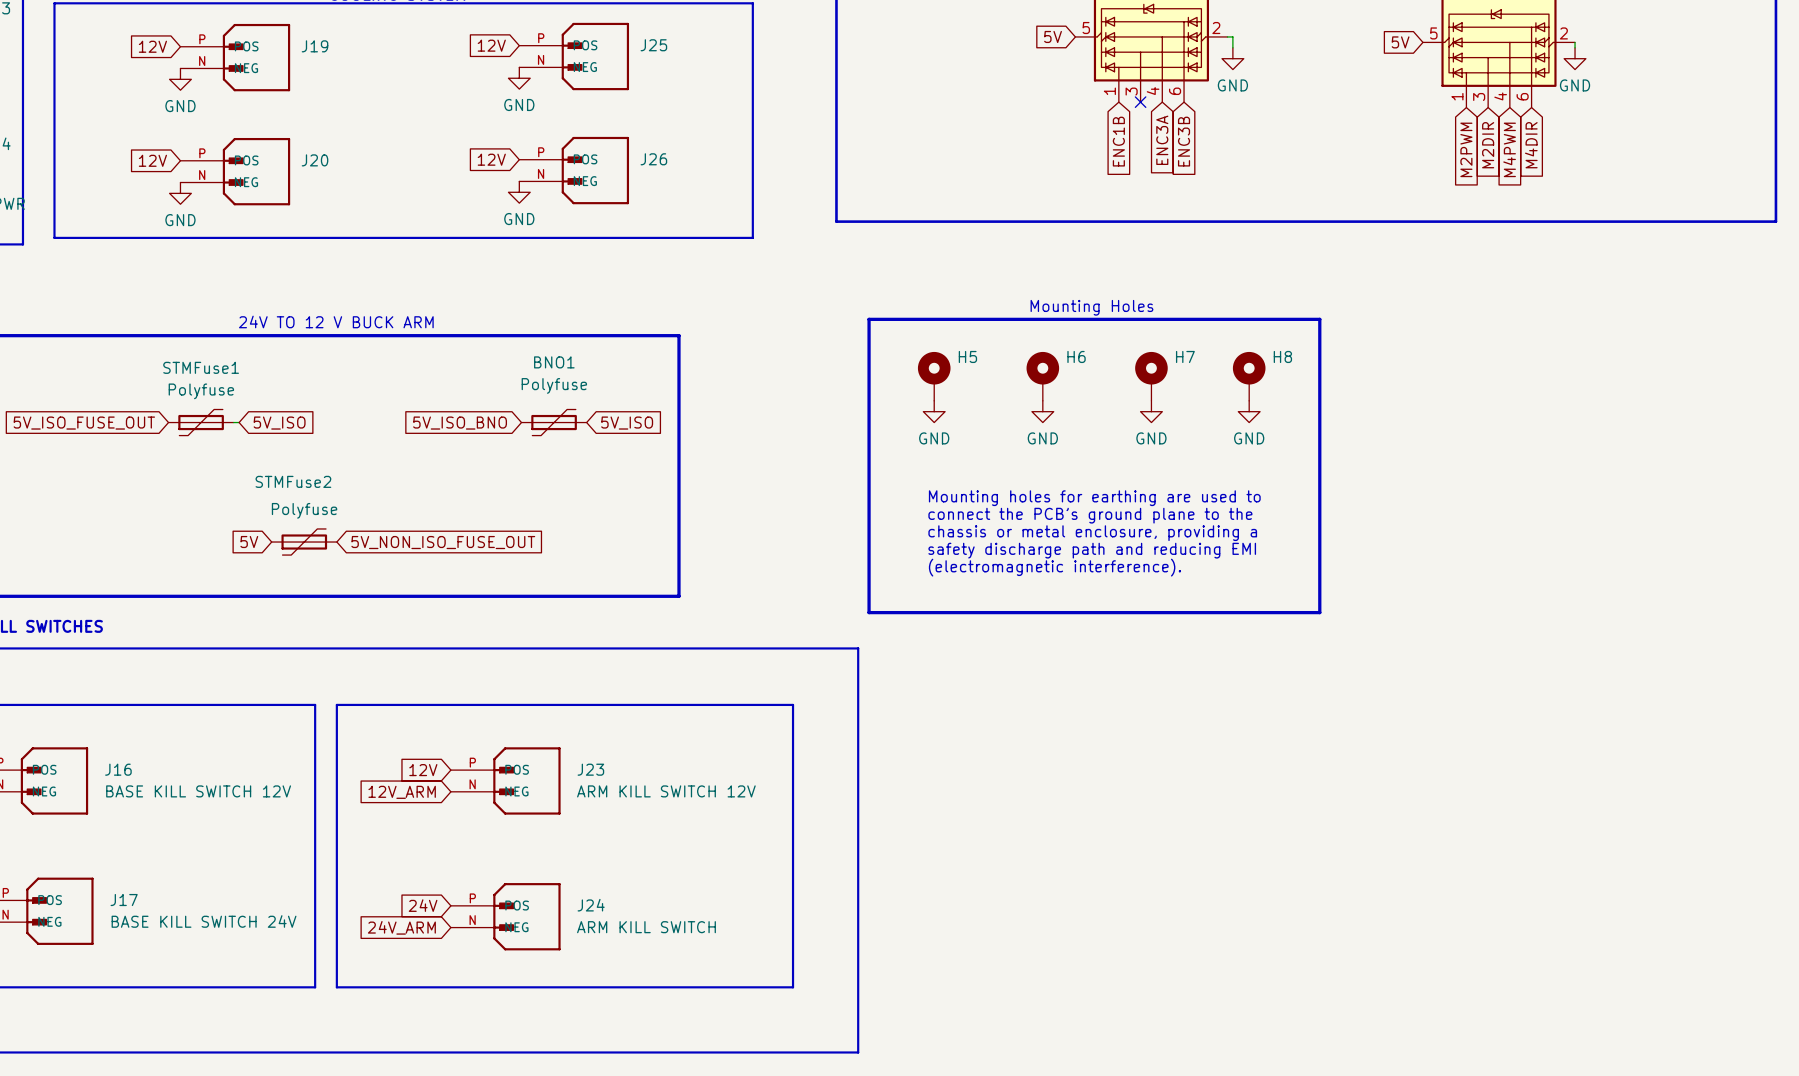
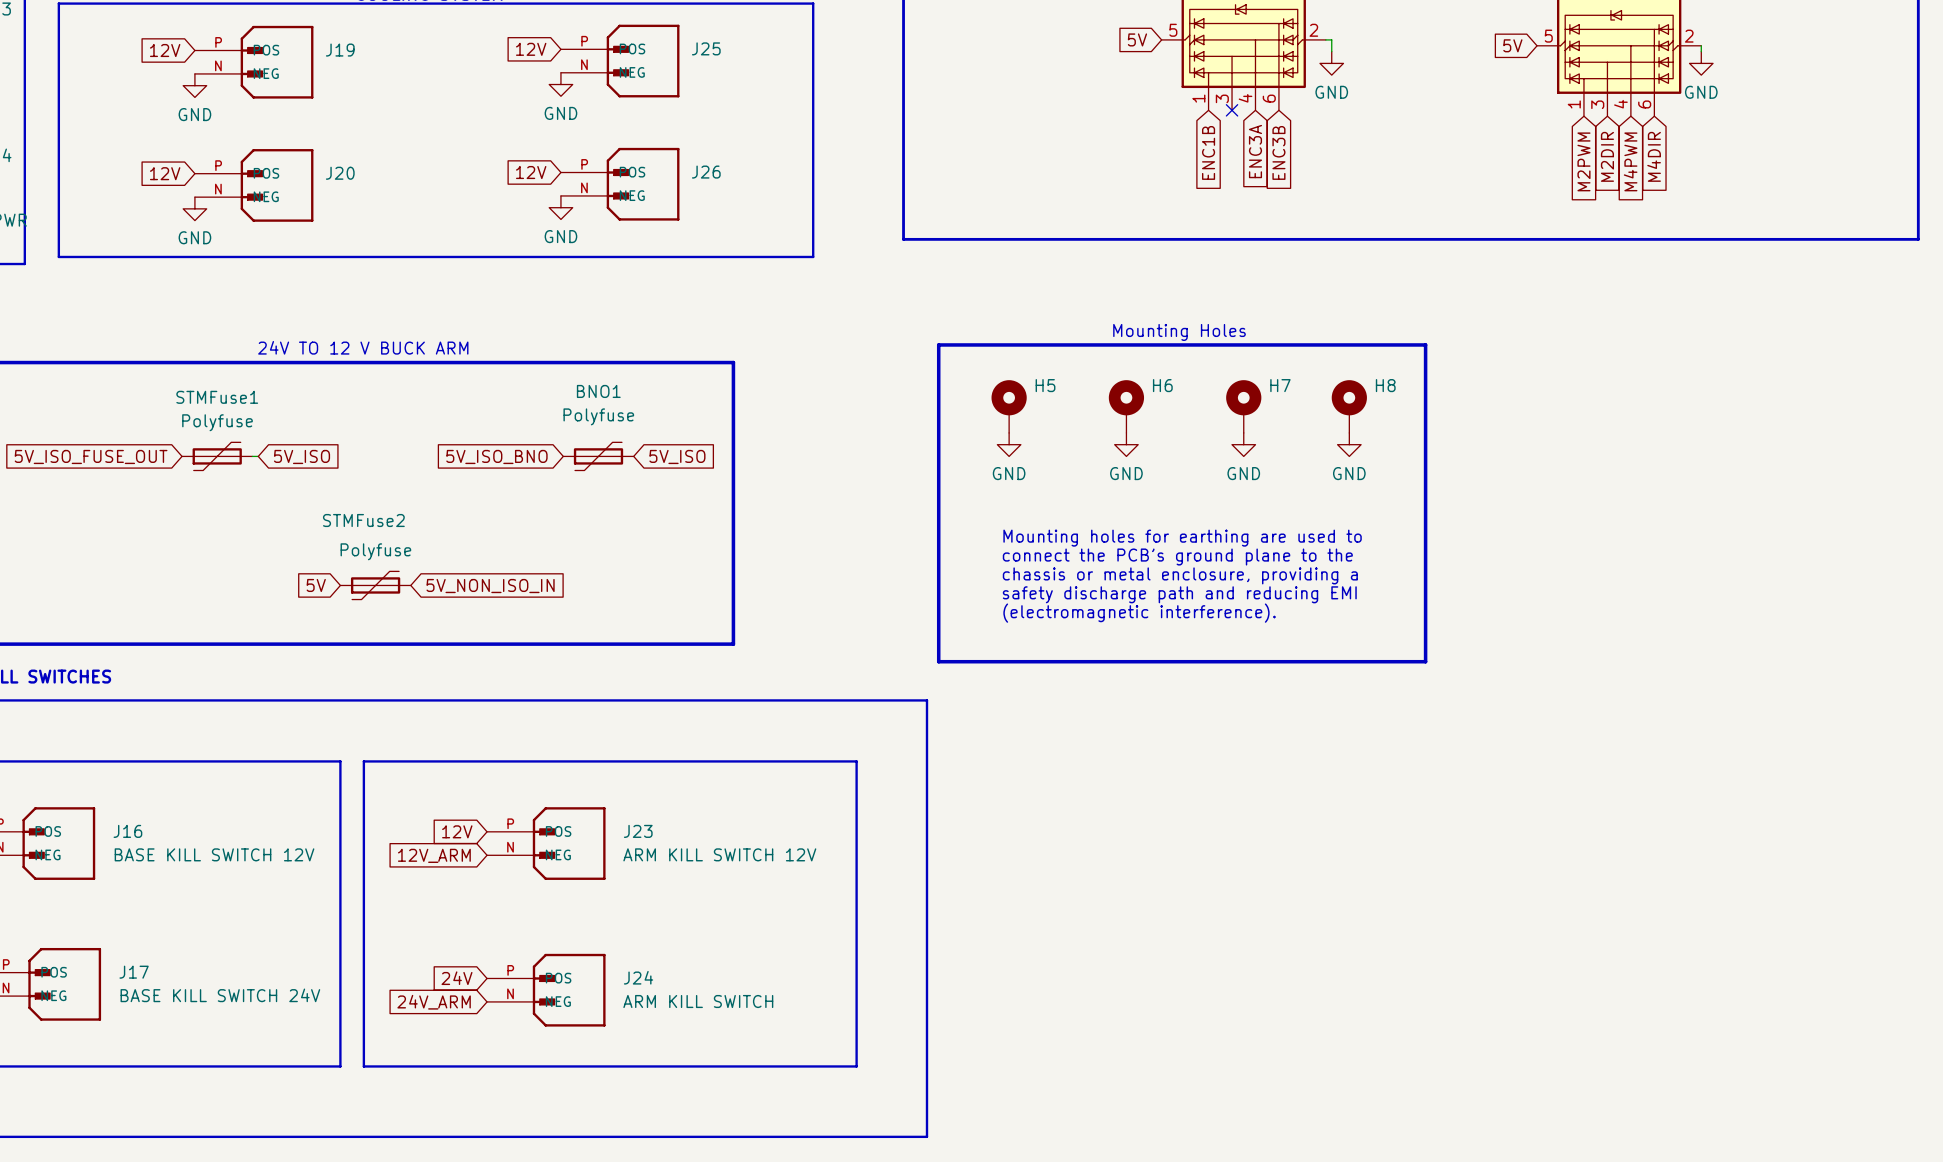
global label position: 5V (249, 542) -> 5V (316, 585)
STMFuse2 position: (304, 542) -> (375, 585)
global label: 5V_NON_ISO_FUSE_OUT (443, 542) -> 5V_NON_ISO_IN (490, 586)

